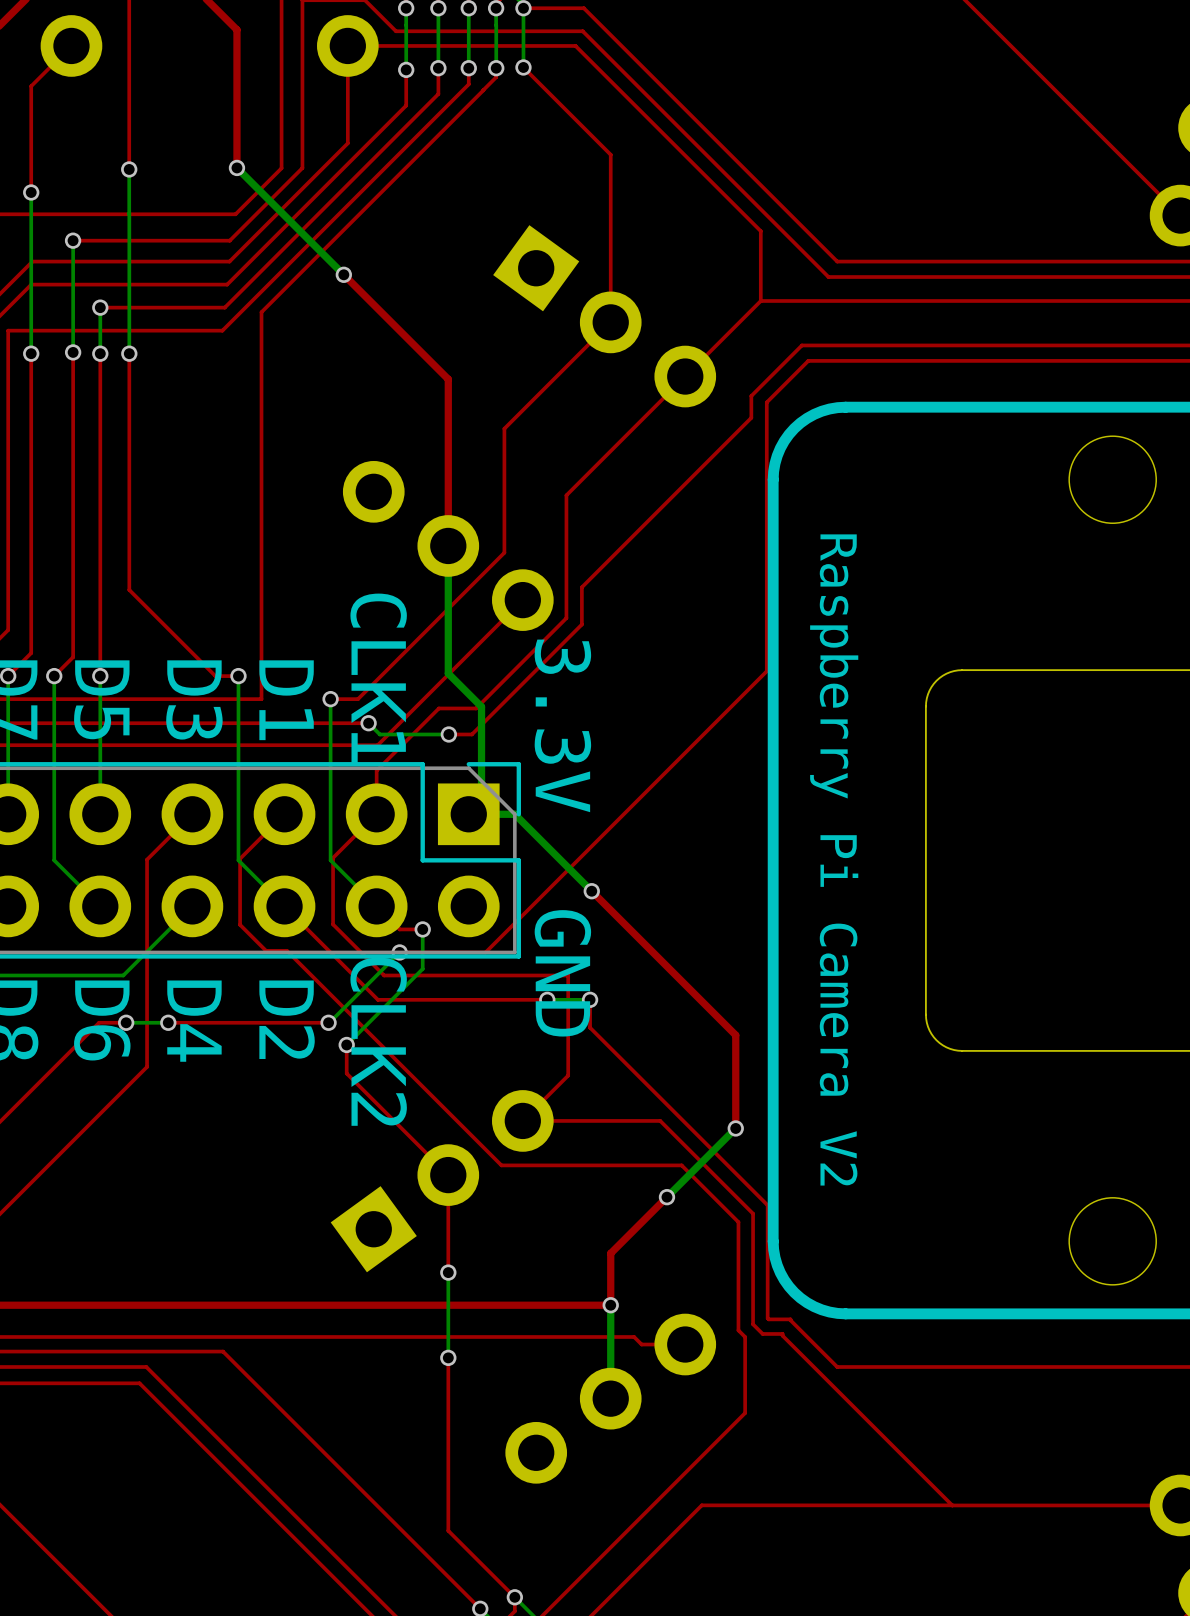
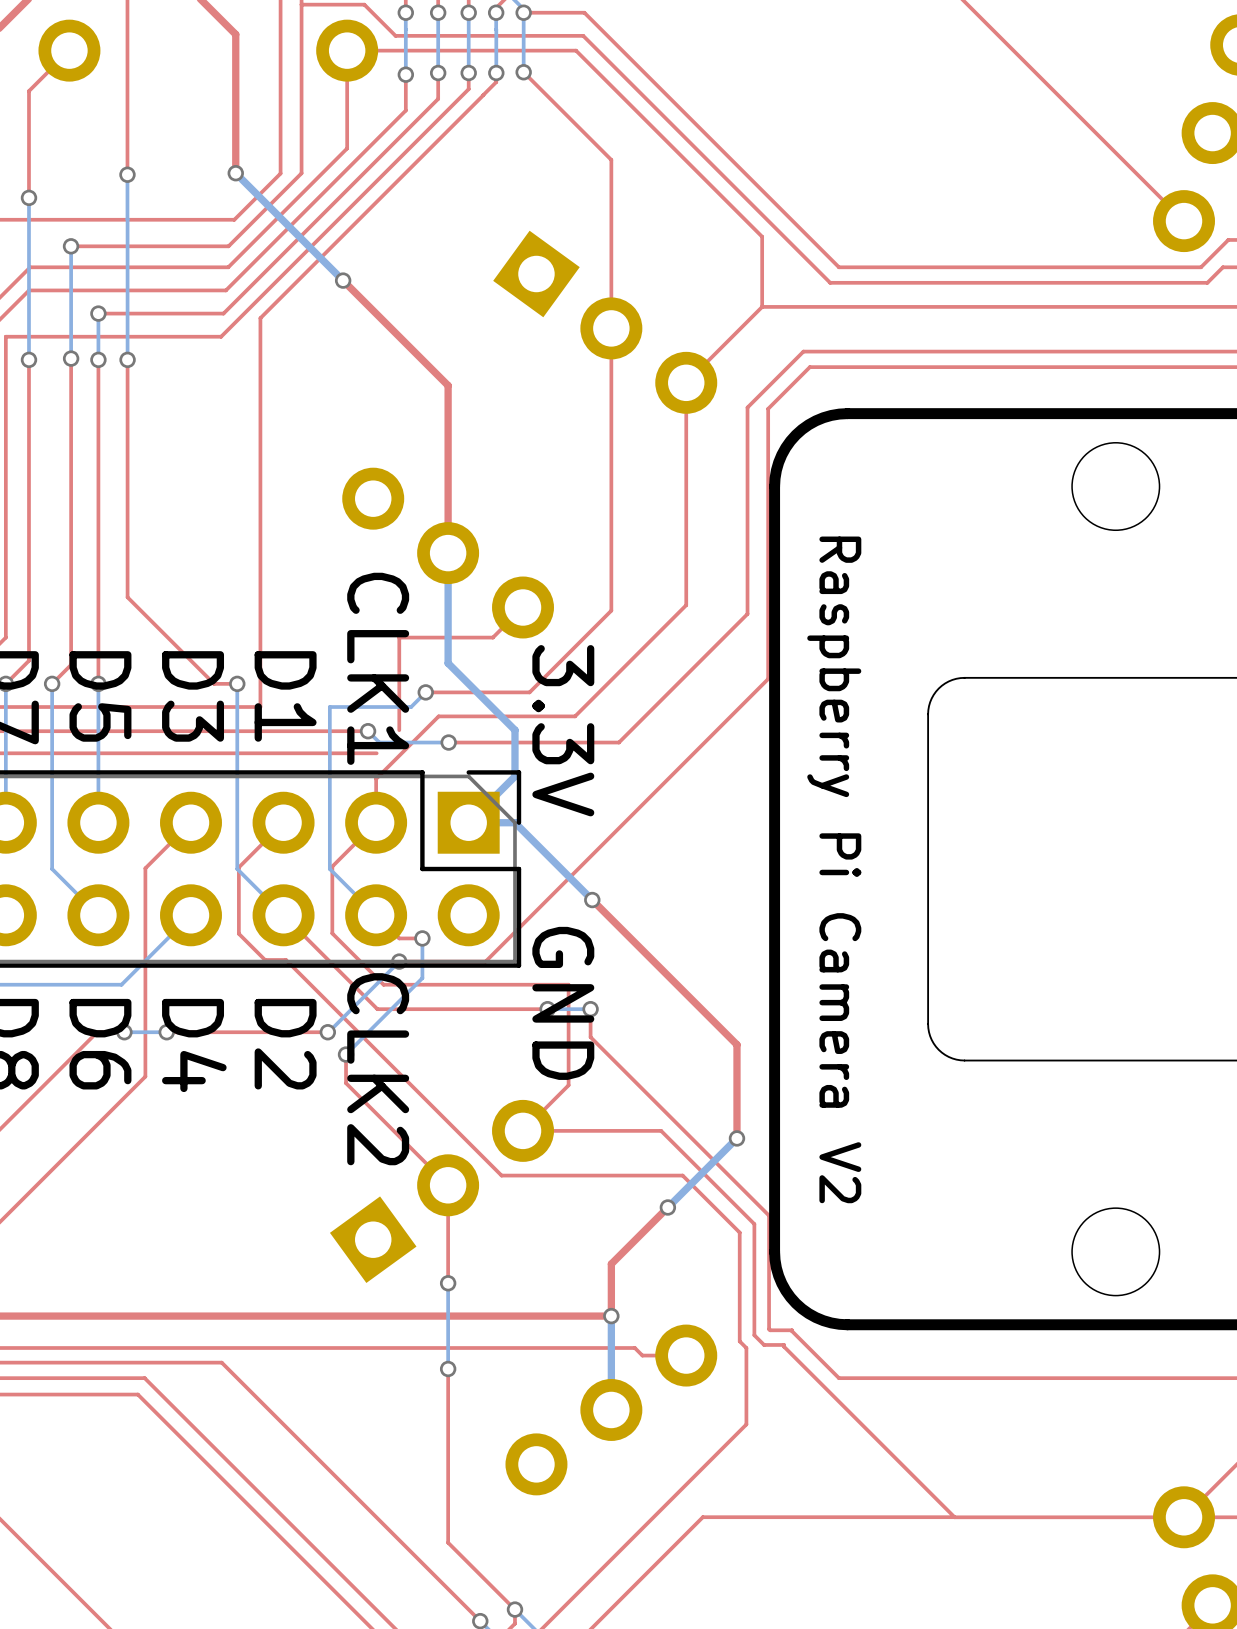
top track: (610, 322) (504, 428) (504, 552) (358, 699) (330, 699) -> (611, 328) (611, 610) (529, 692) (425, 692)
top track: (685, 376) (566, 495) (566, 618) (476, 708) -> (686, 382) (686, 605) (575, 716) (476, 716)
top track: (751, 396) (751, 417) (581, 587) (581, 624) (471, 734) -> (752, 402) (747, 407) (747, 613) (618, 742) (471, 742)
top track: (492, 630) (377, 745) -> (492, 637) (399, 637) (399, 730)
bottom track: (448, 655) (448, 673) (481, 706) (481, 801) -> (448, 663) (514, 730) (514, 776) (481, 809)
bottom track: none -> (425, 692) (411, 707) (329, 707)
via position: (330, 699) -> (425, 692)

